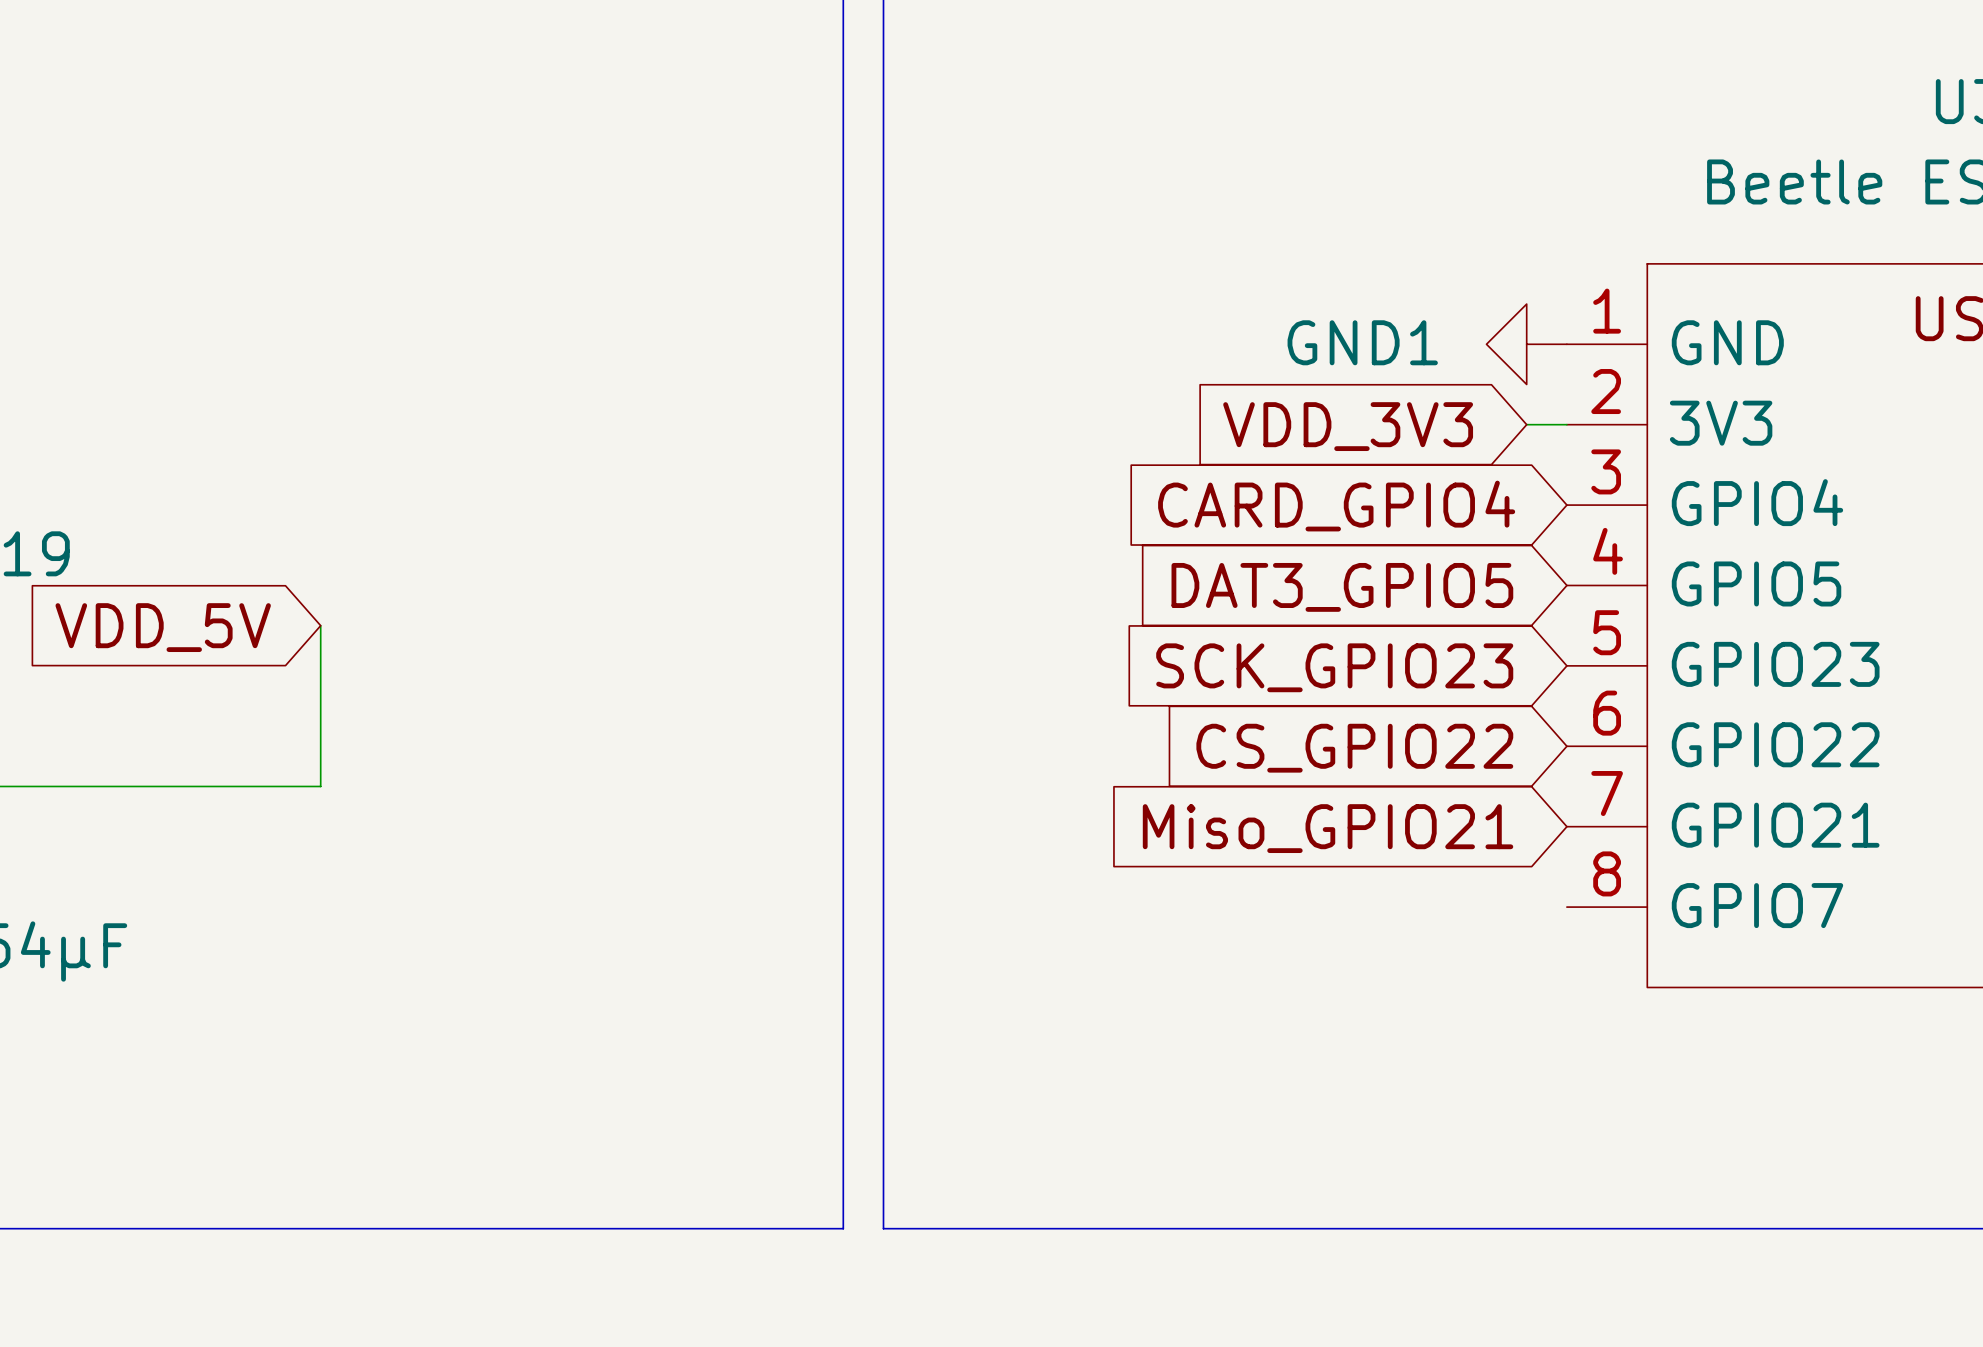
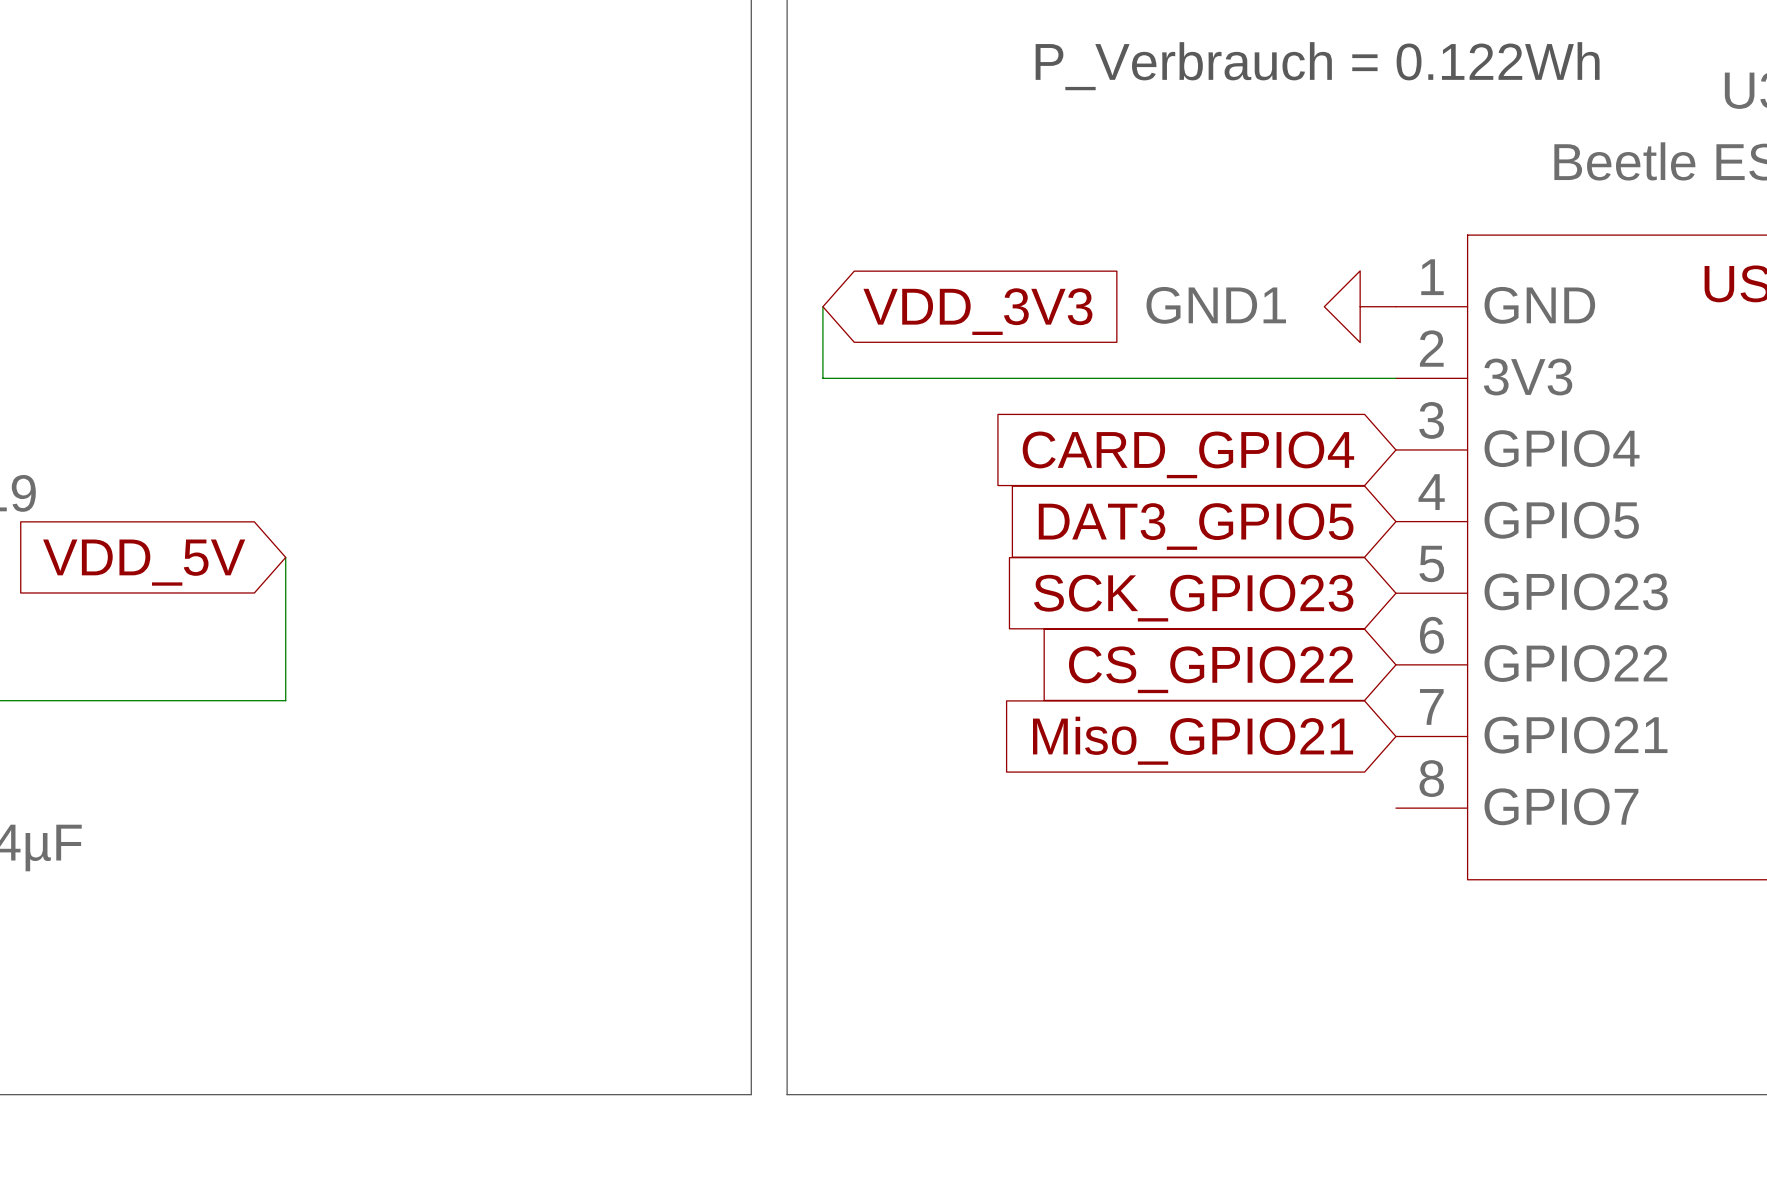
text: none -> P_Verbrauch = 0.122Wh (1317, 66)
wire: none -> (822, 306) (822, 378) (1360, 378)
global label rotation: 0° (1348, 426) -> 180° (977, 311)

